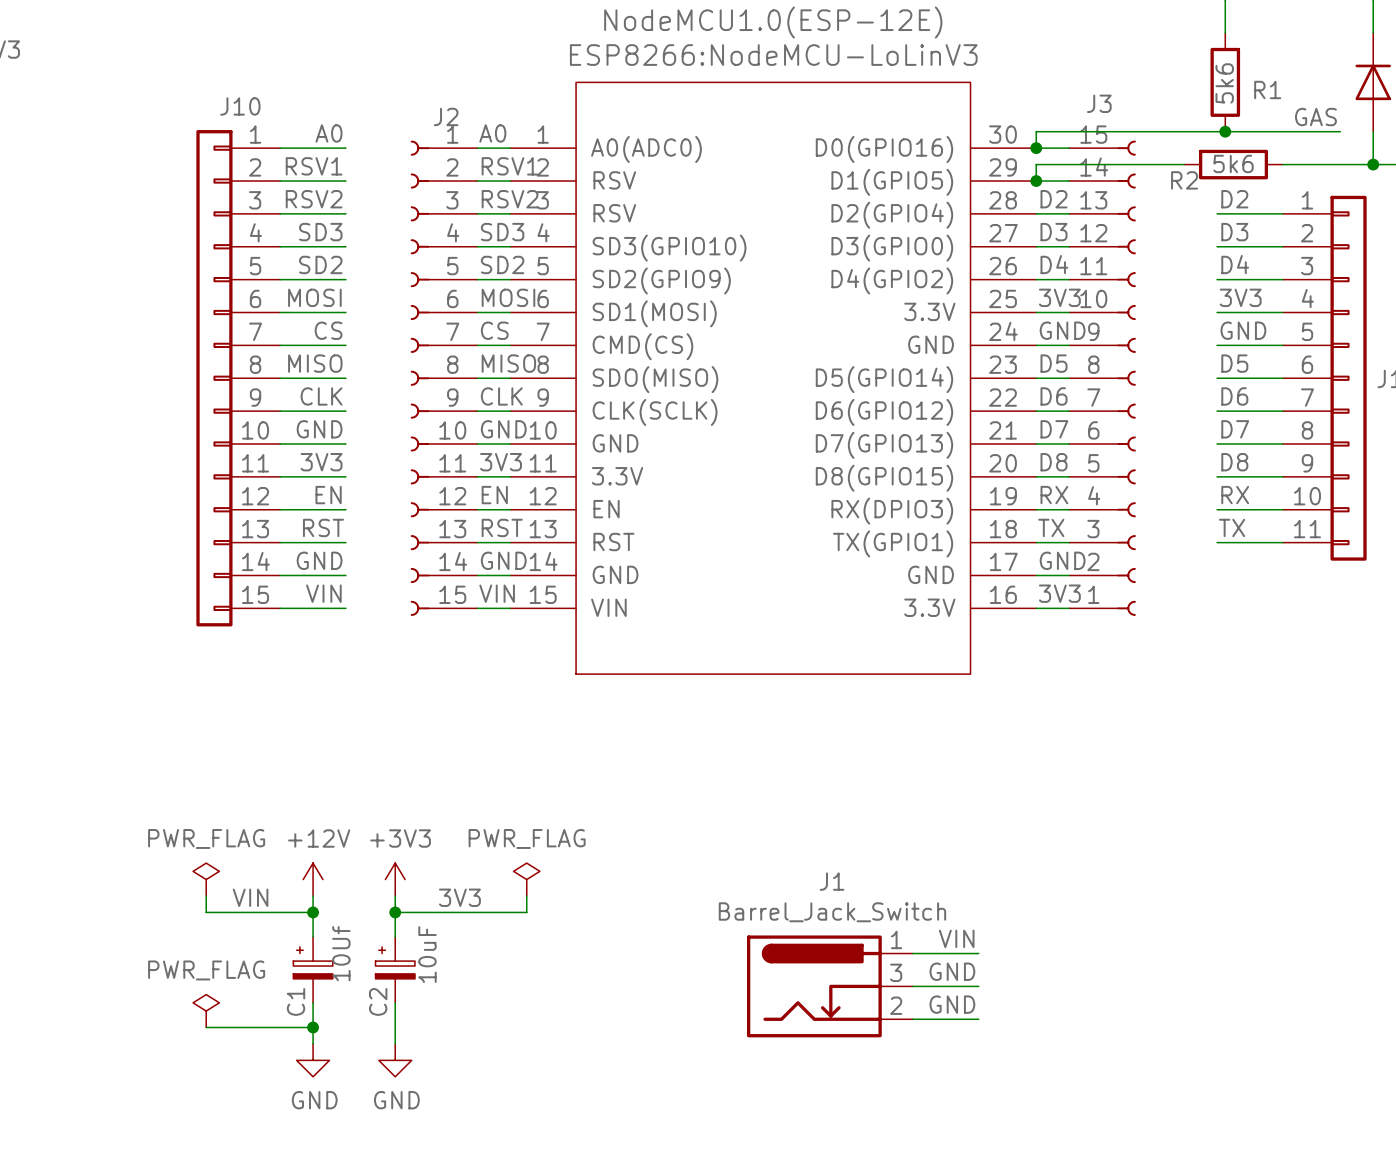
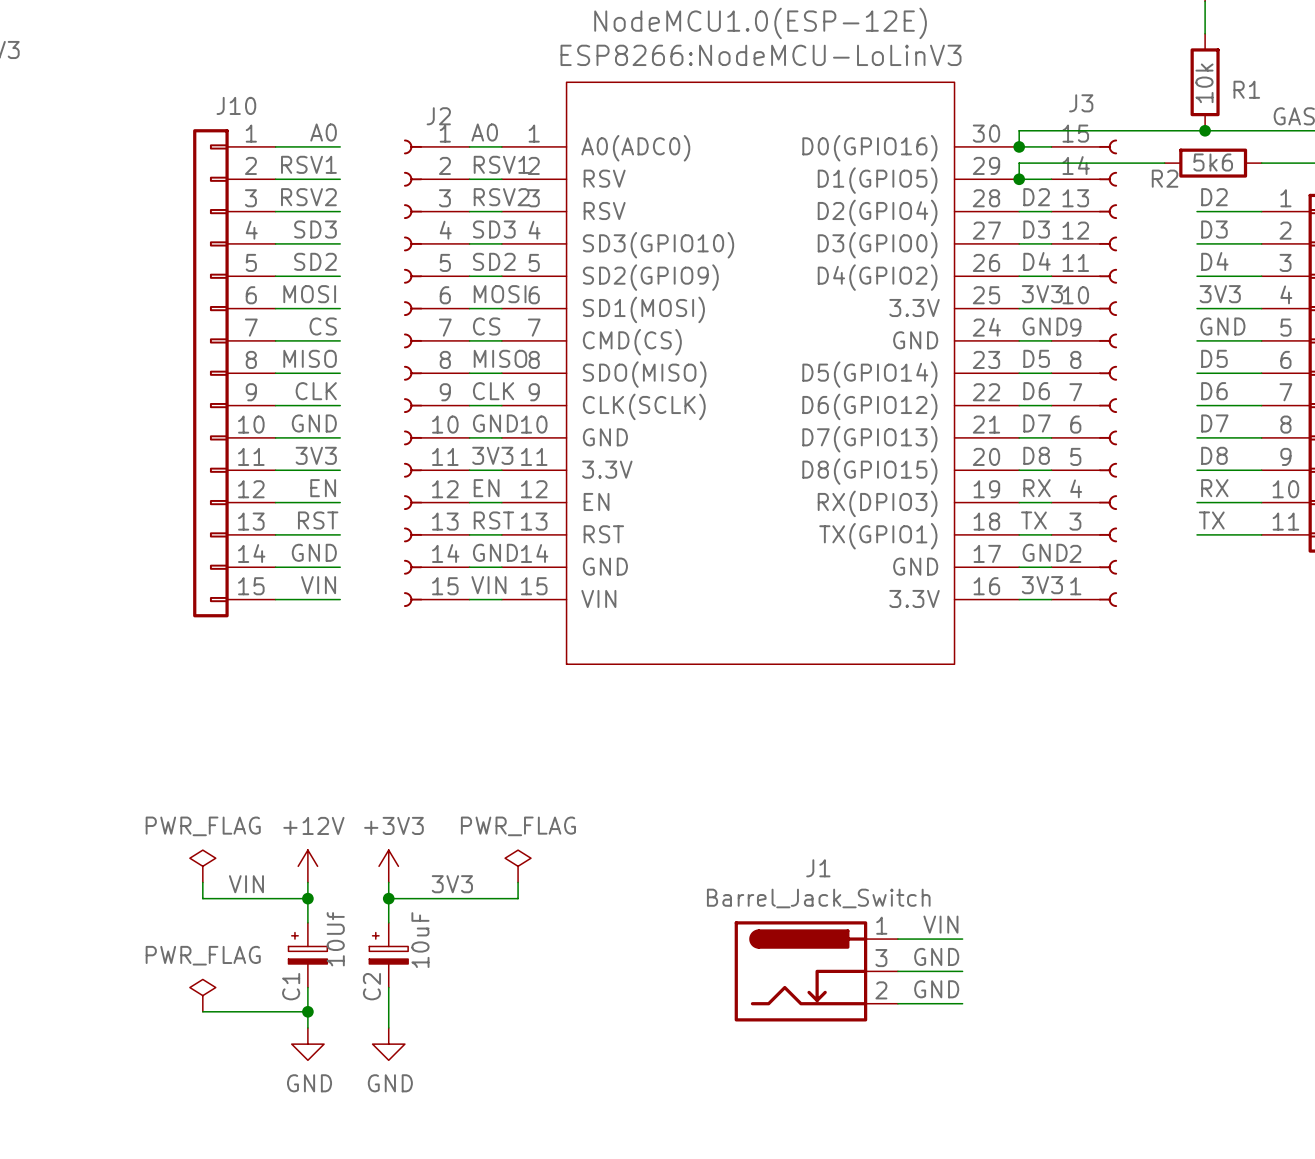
R1 value: 5k6 (1224, 83) -> 10k (1204, 83)

